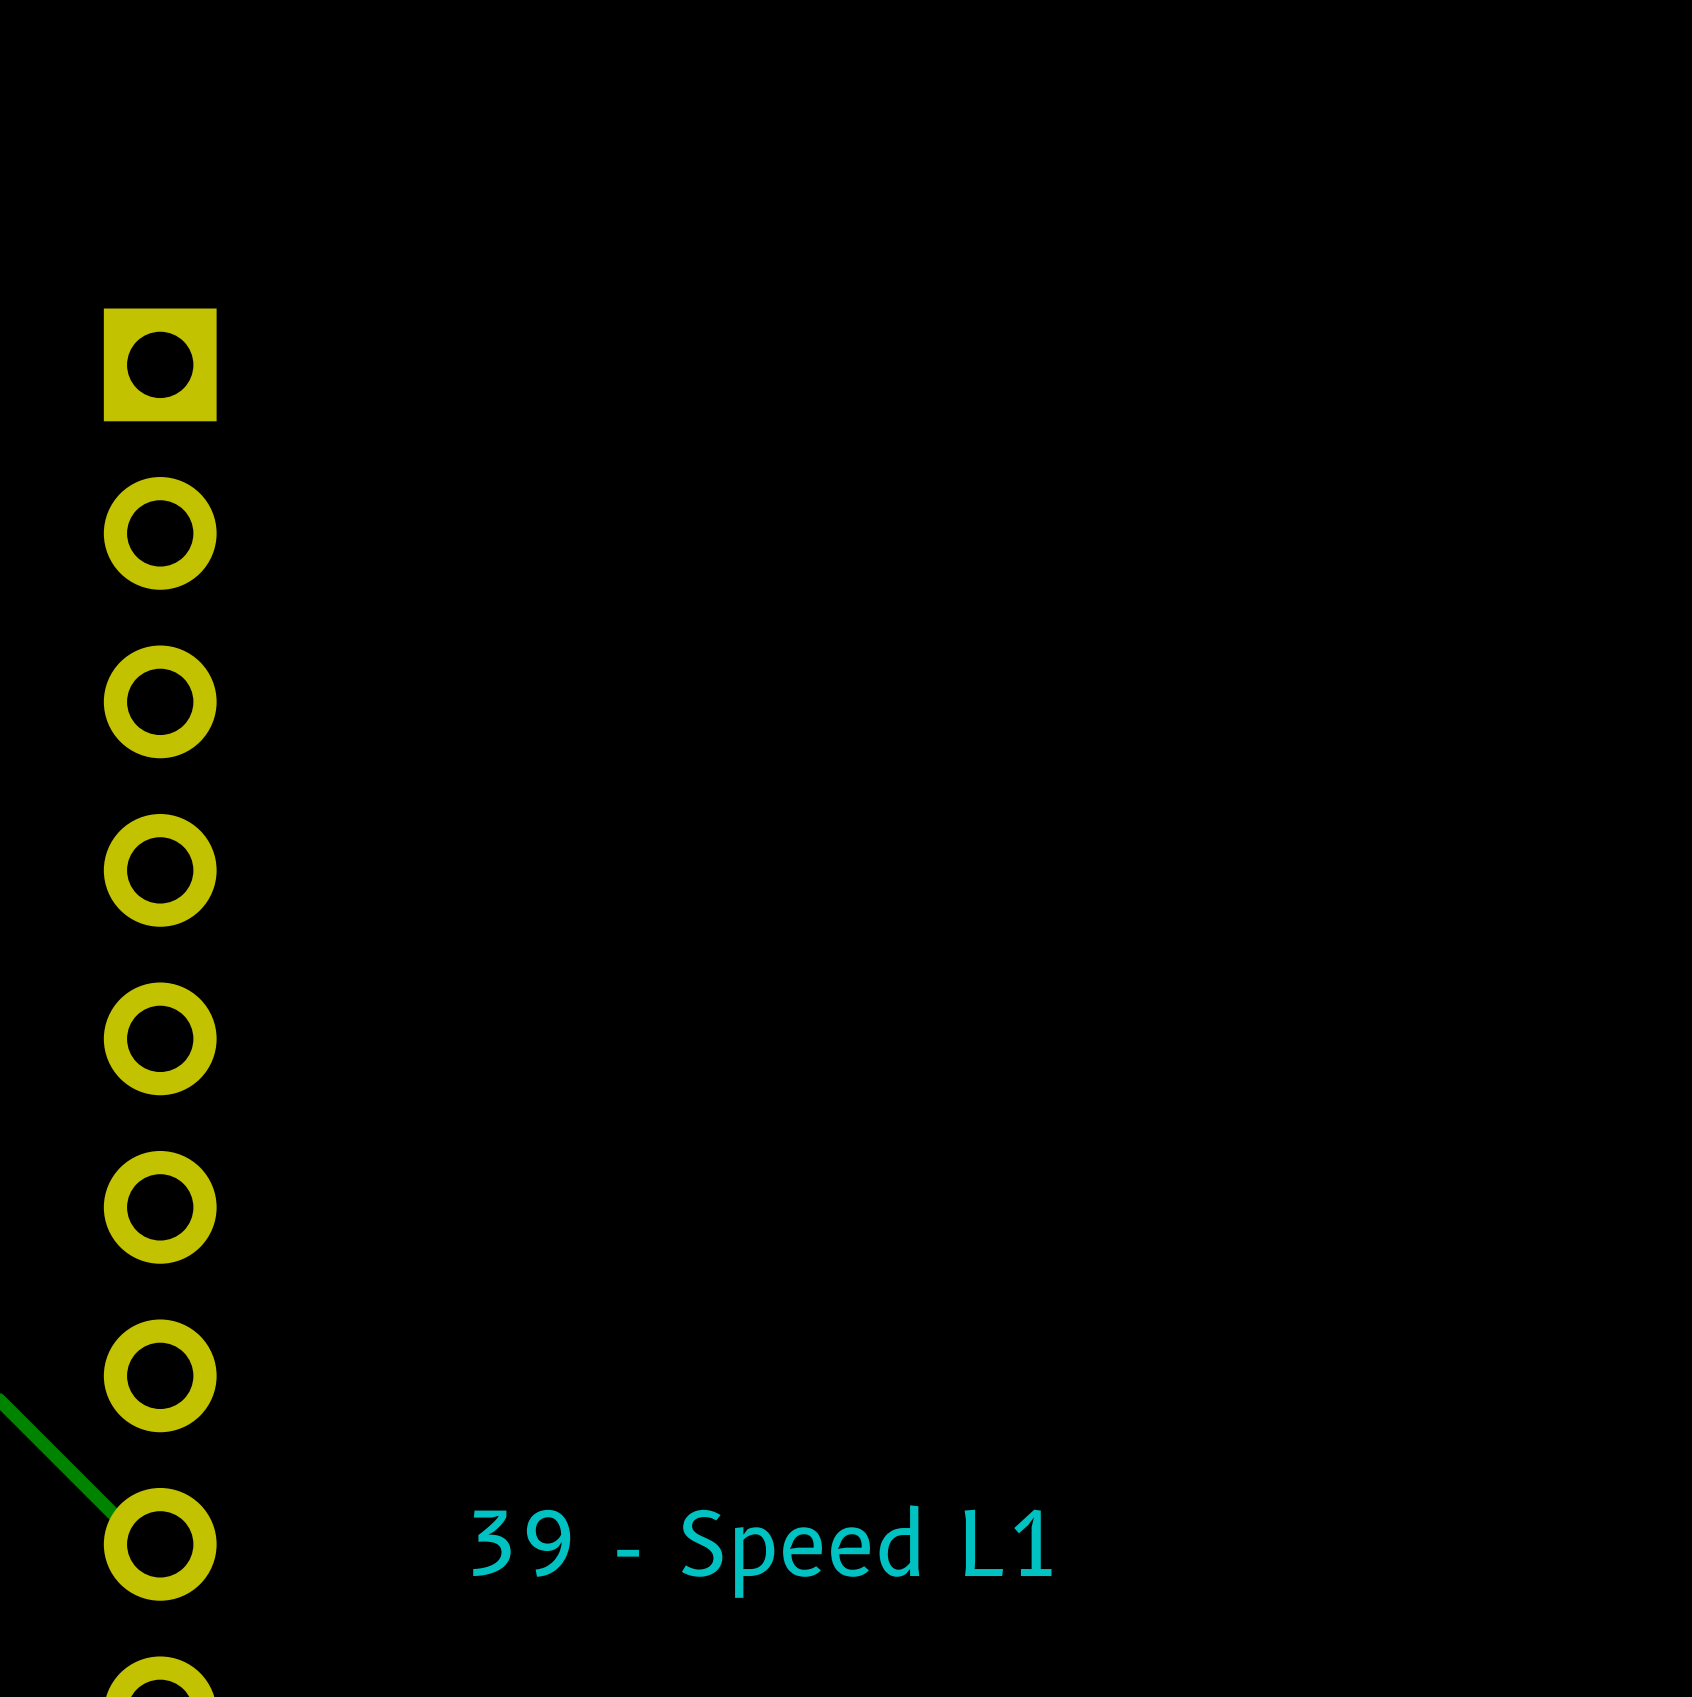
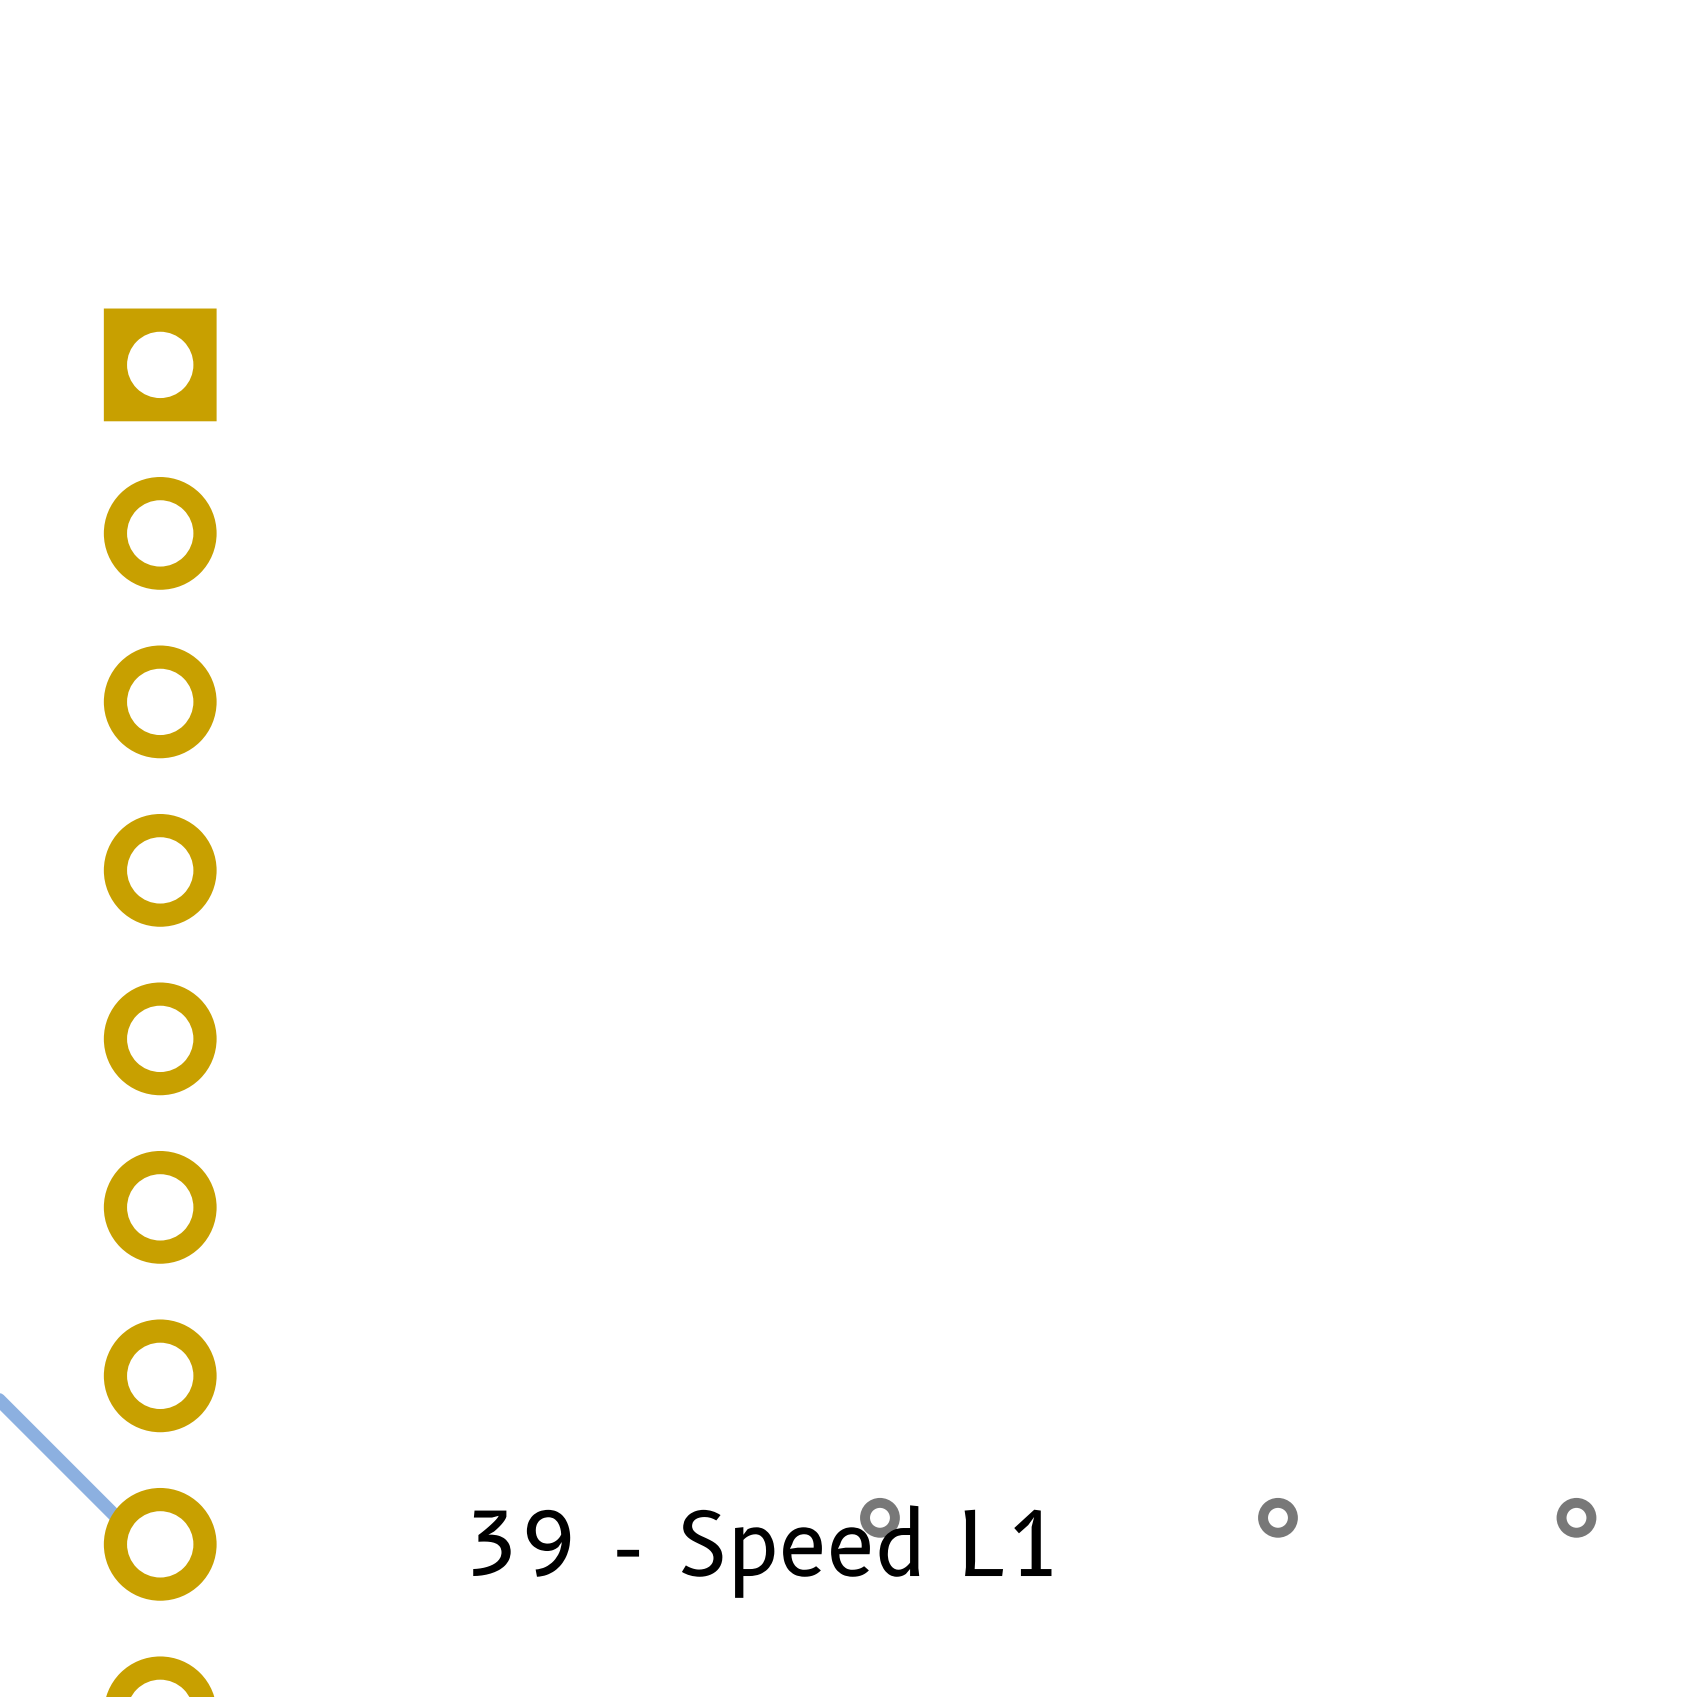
via: none -> (879, 1517)
via: none -> (1277, 1517)
via: none -> (1576, 1517)

